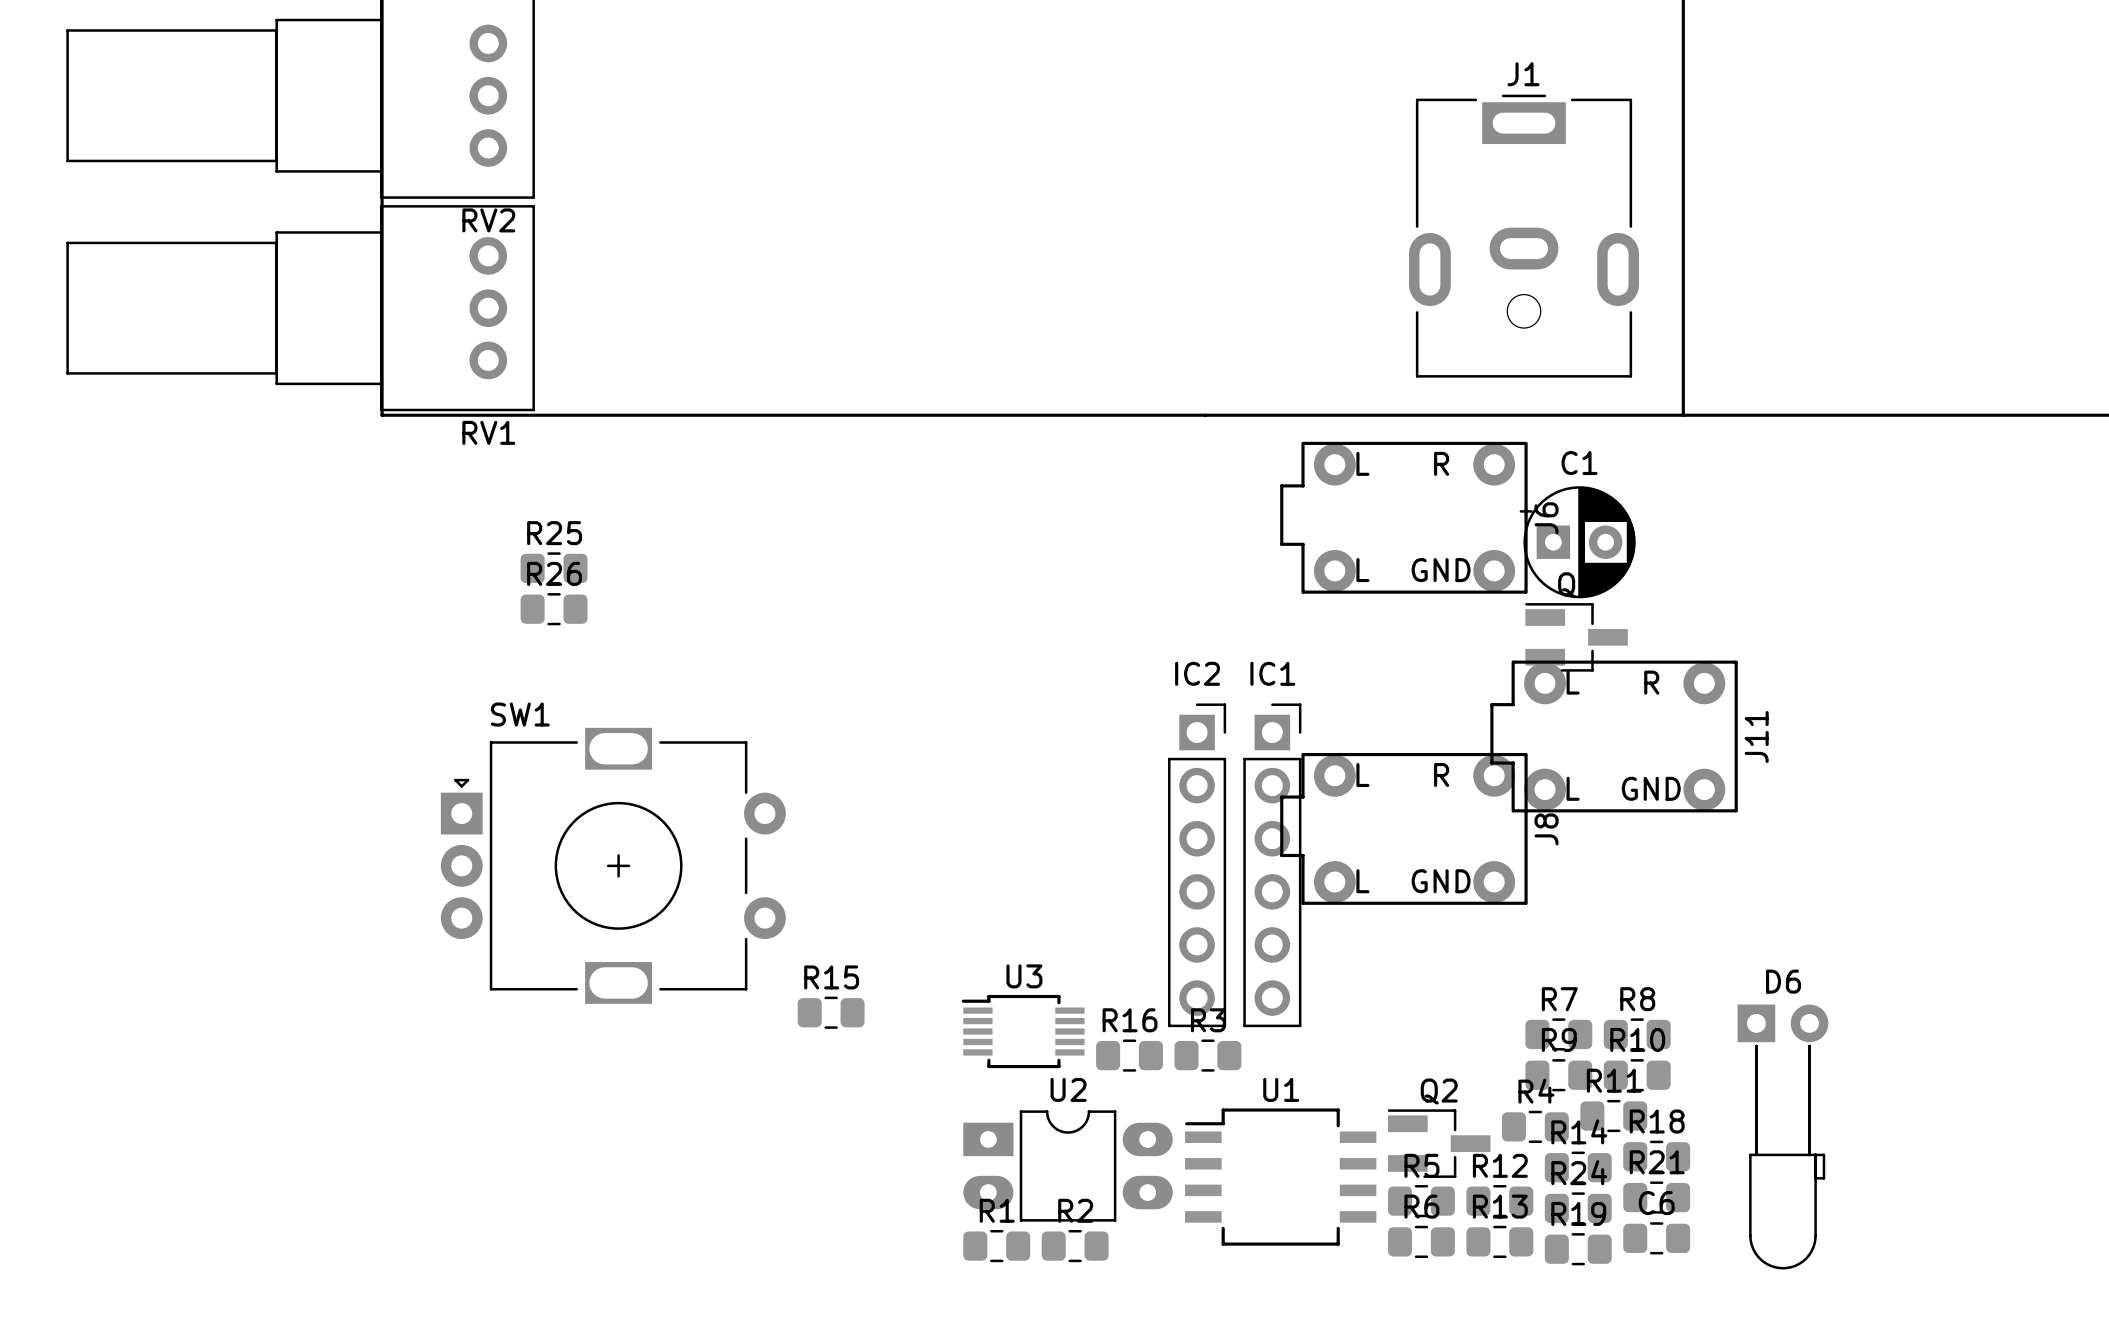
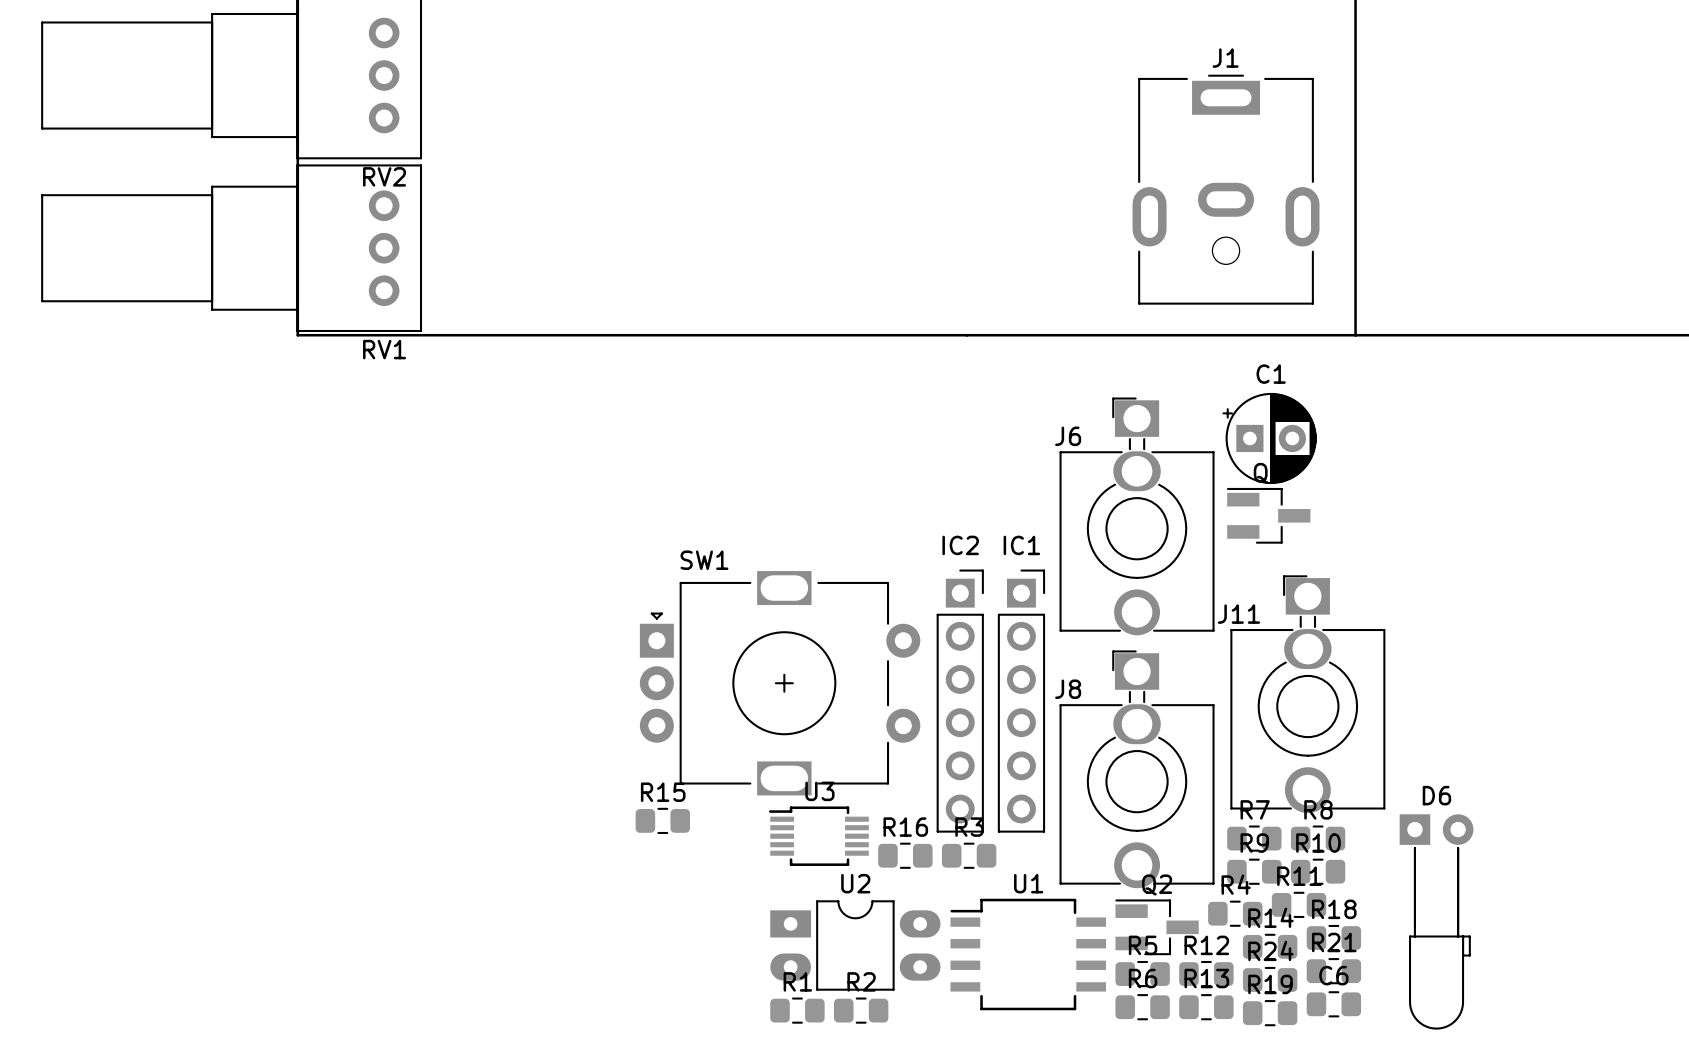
J6 footprint: [1280, 441, 1528, 594] -> [1059, 397, 1215, 636]
J6 name position: J6 (1546, 518) -> J6 (1068, 436)
R25: (554, 568) -> none
R26: (554, 609) -> none
J11 footprint: [1490, 660, 1738, 813] -> [1230, 575, 1386, 814]
J11 name position: J11 (1756, 736) -> J11 (1238, 614)
J8 footprint: [1280, 752, 1528, 905] -> [1059, 650, 1215, 889]
J8 name position: J8 (1546, 829) -> J8 (1068, 689)
SW1 position: (613, 865) -> (780, 683)

